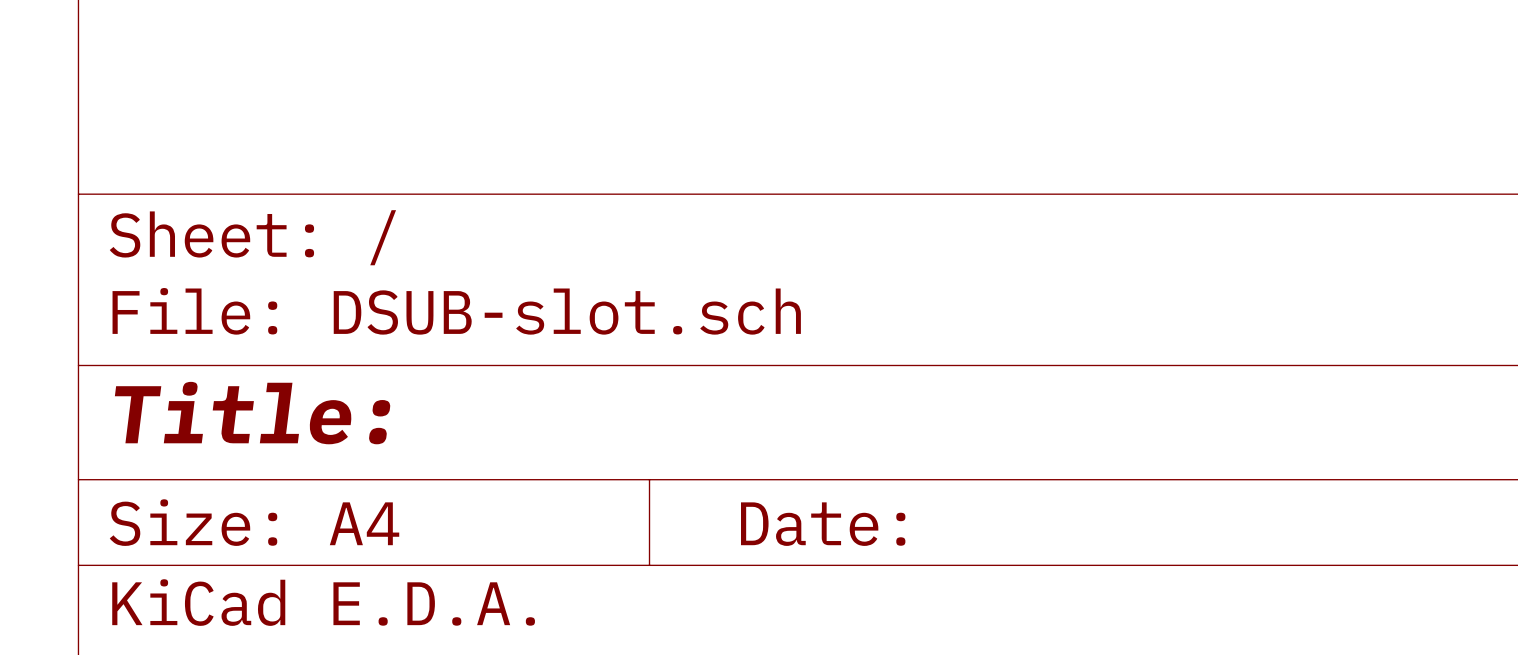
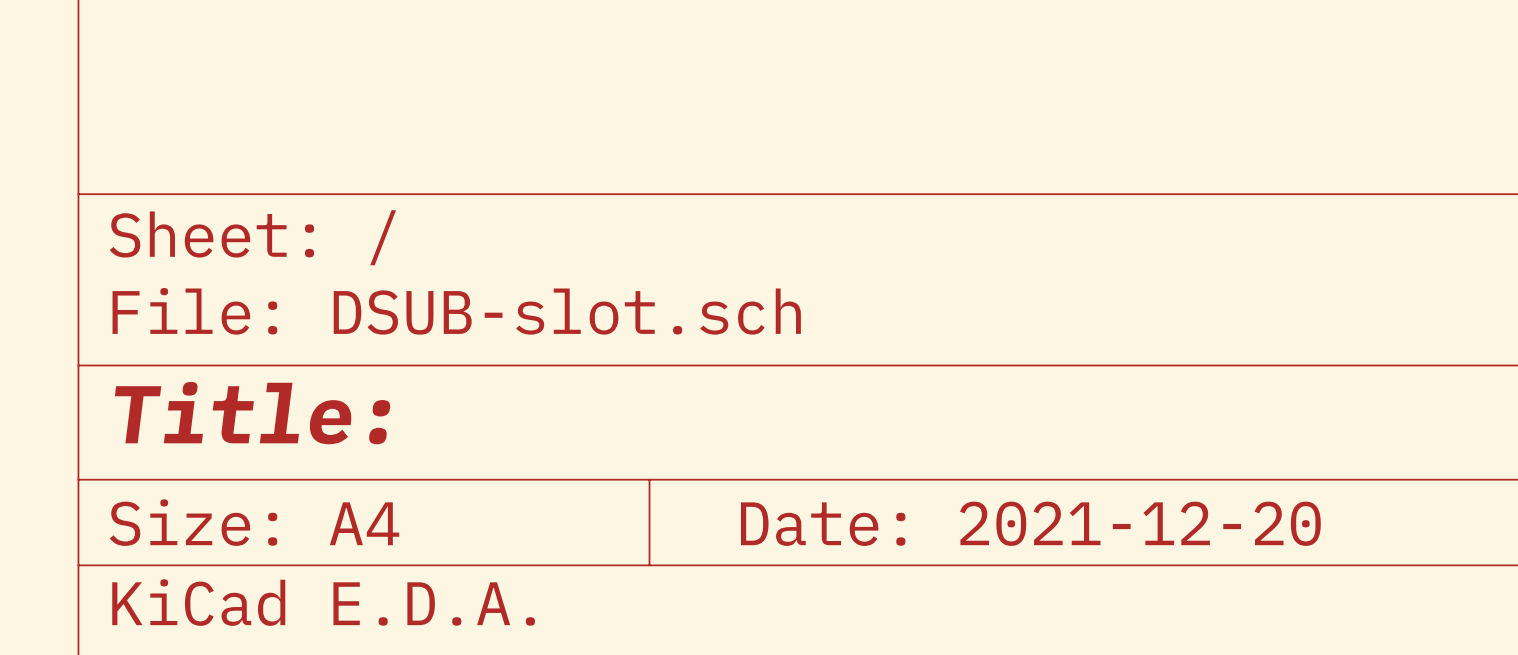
title block: Date: (823, 524) -> Date: 2021-12-20 (1030, 523)

